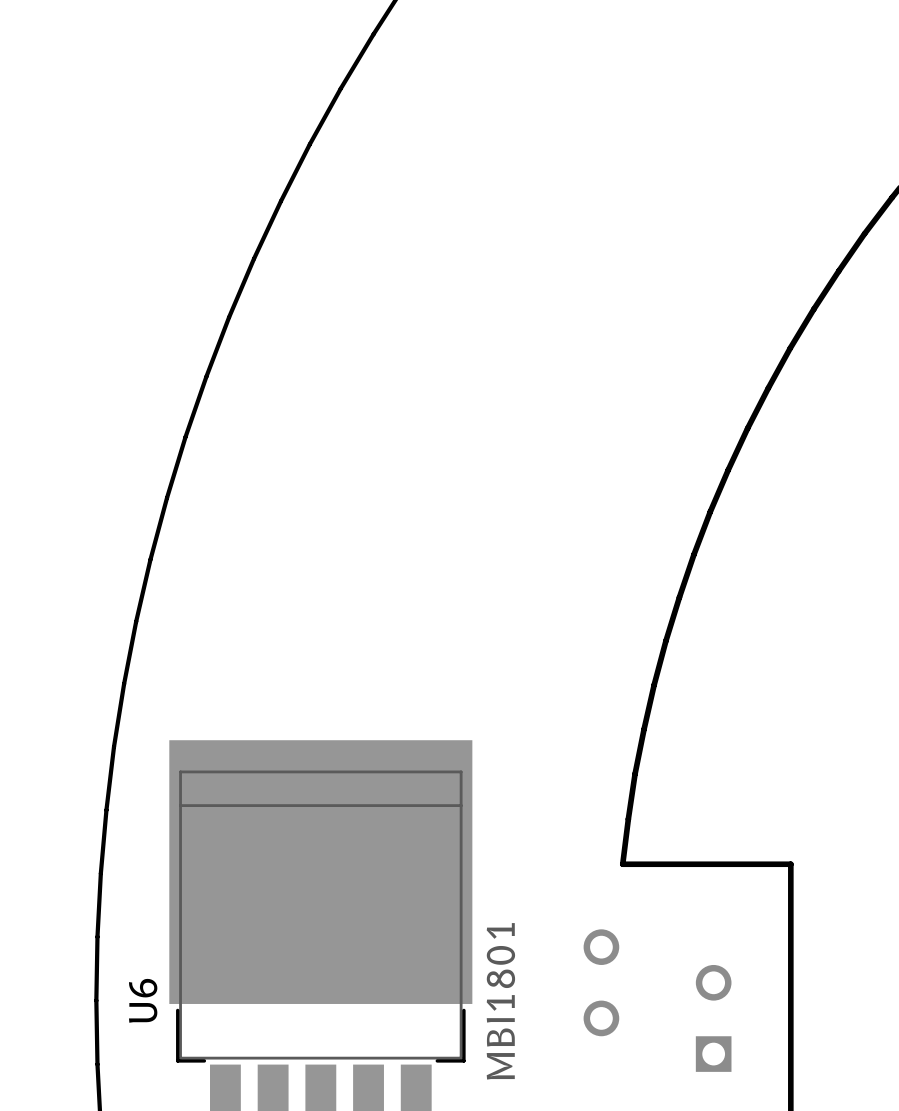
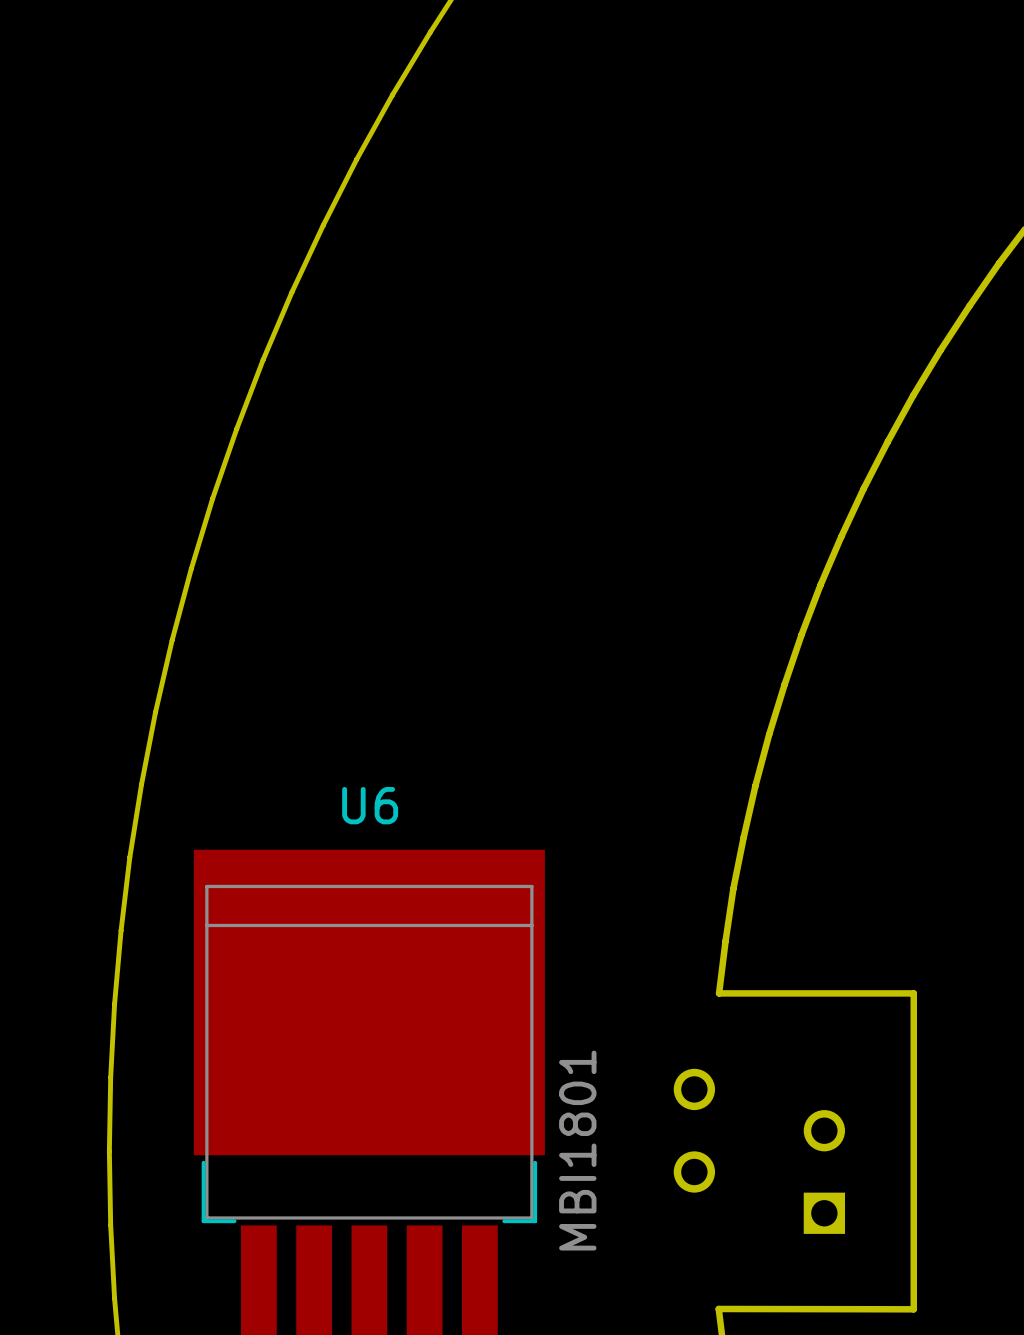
U6 name rotation: 0° (143, 1000) -> 90° clockwise (370, 805)
U6 name position: U6 (143, 1000) -> U6 (370, 805)

